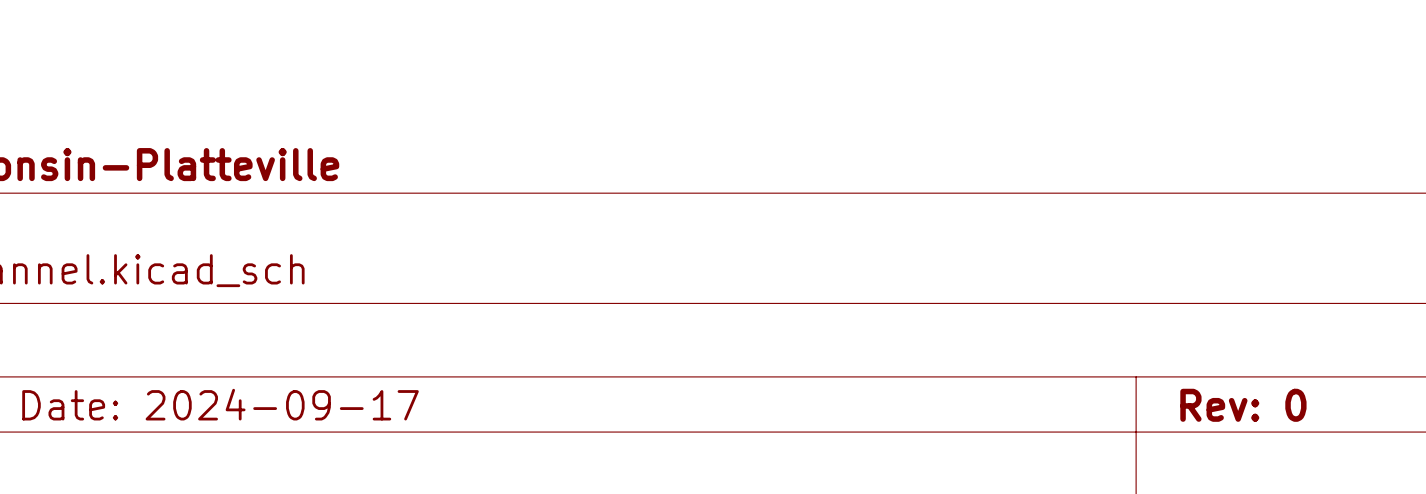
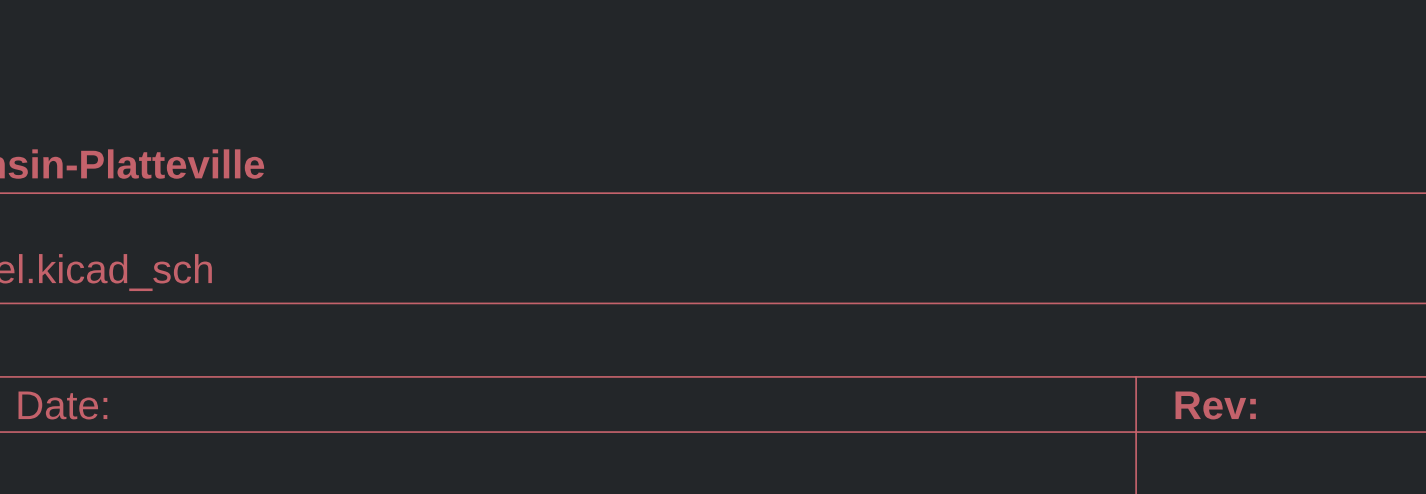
title block: Date: 2024-09-17 (220, 404) -> Date: (62, 405)
title block: Rev: 0 (1243, 405) -> Rev: (1215, 405)

